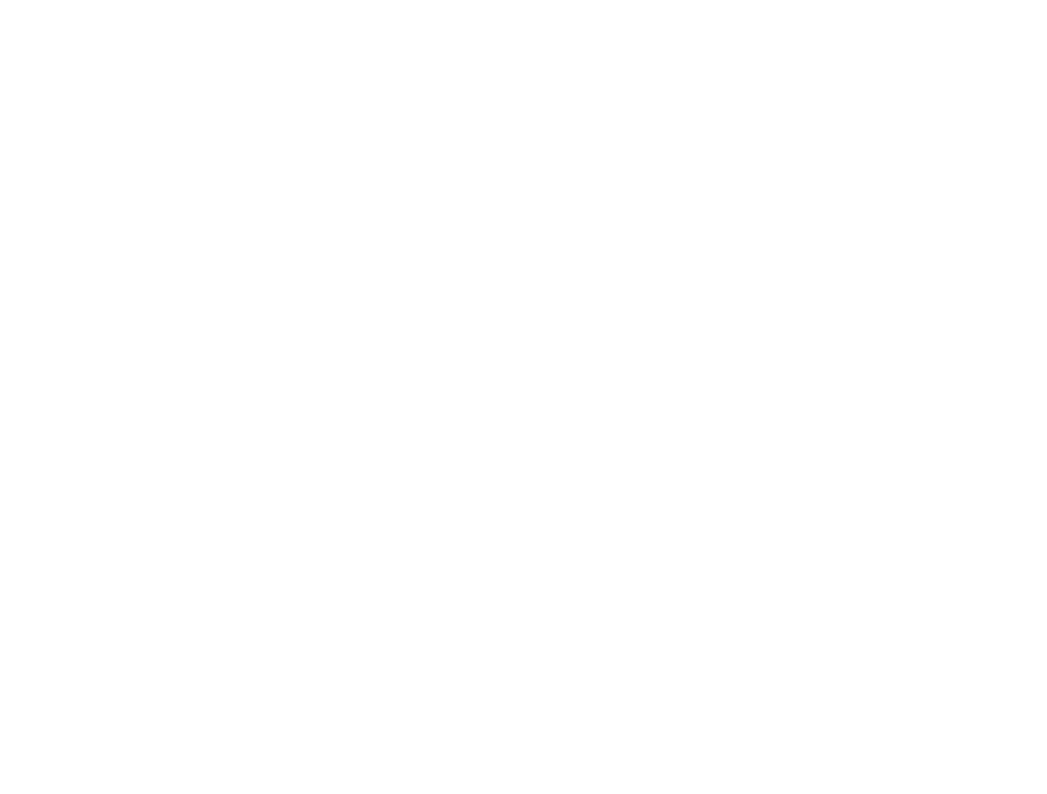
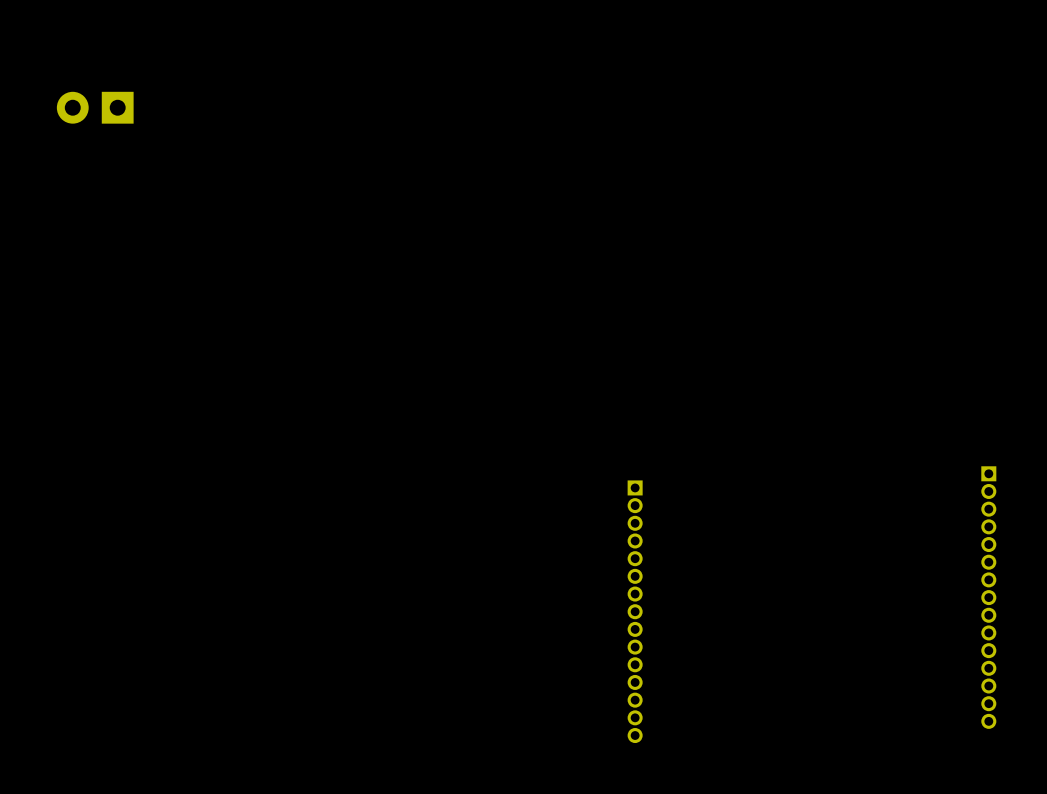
part: none -> (95, 107)
part: none -> (988, 597)
part: none -> (635, 611)

